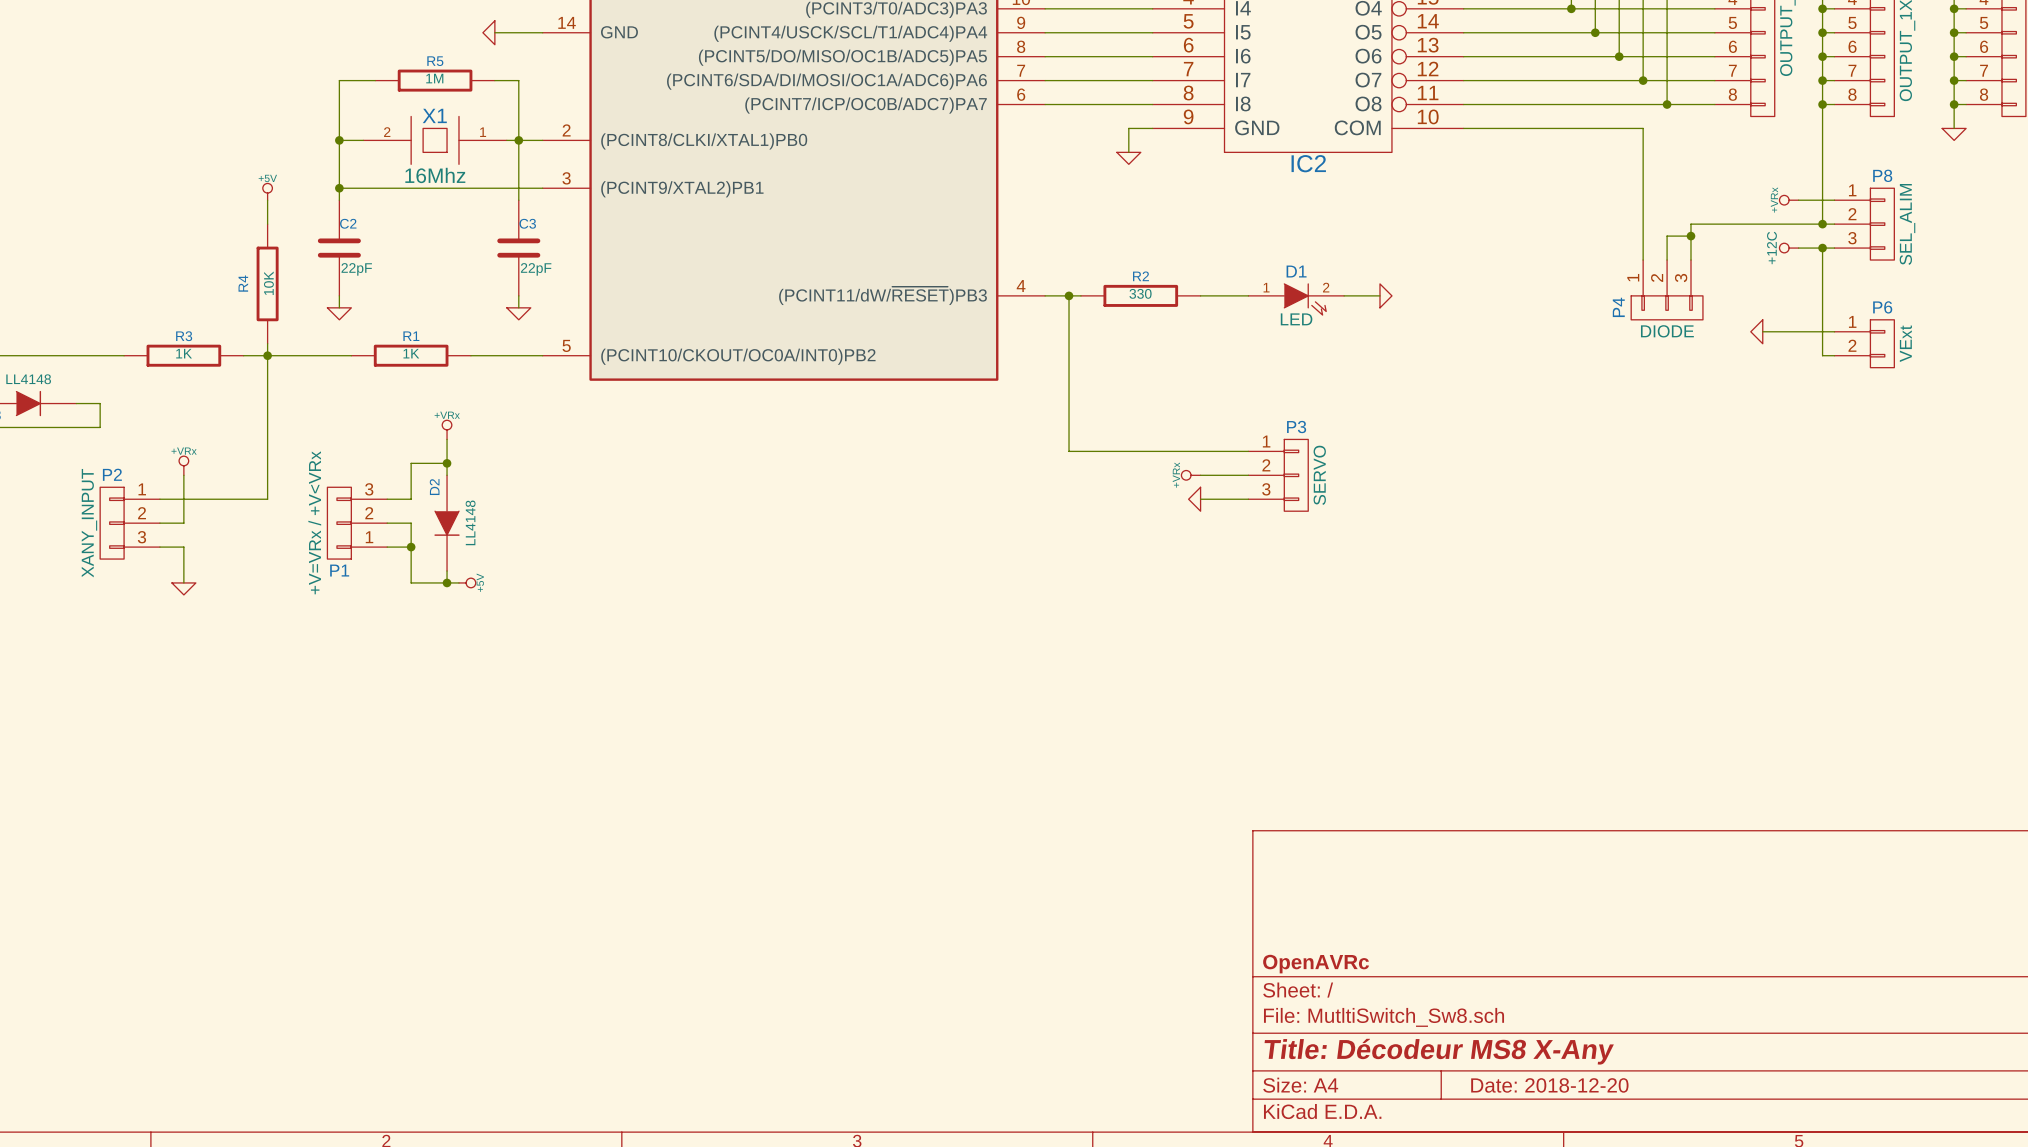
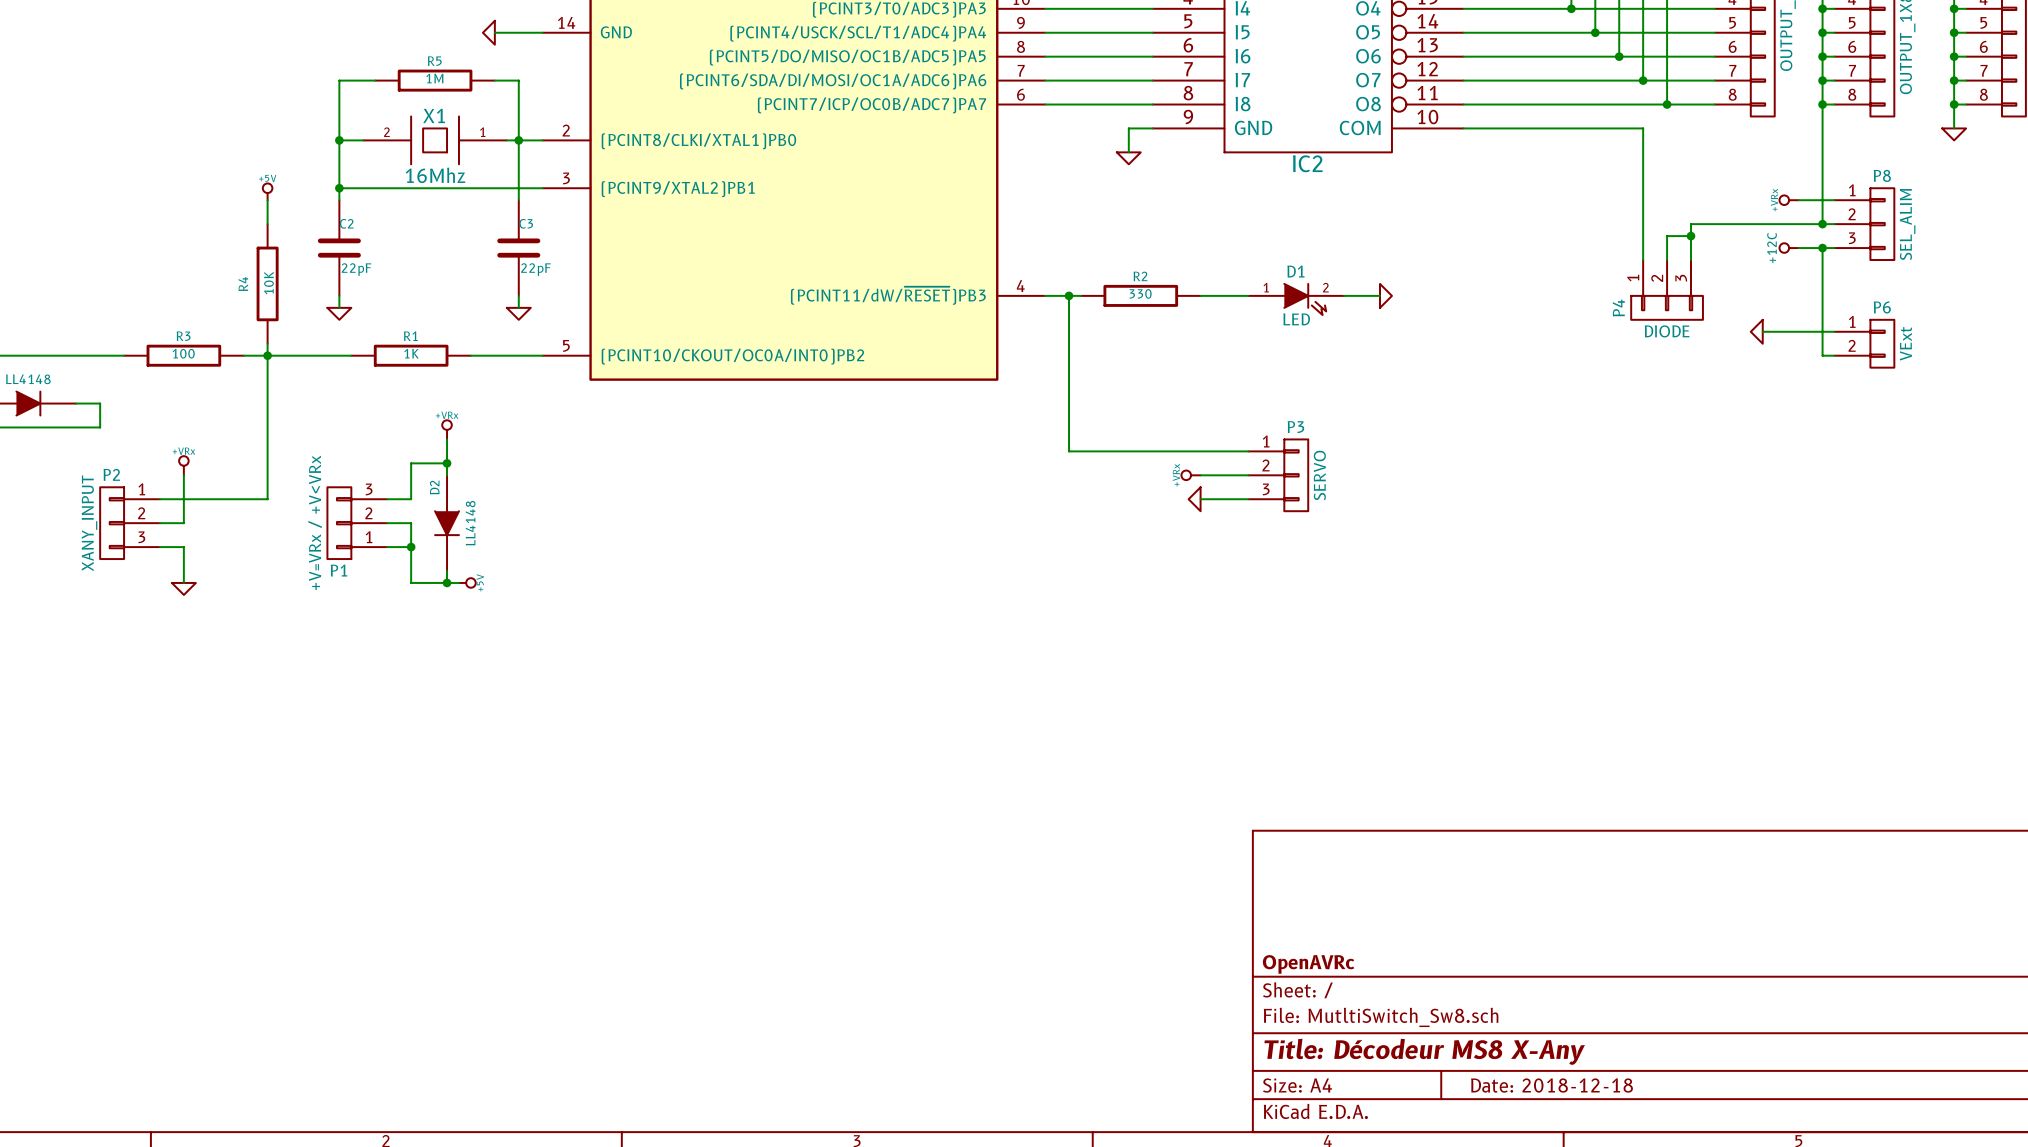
R3 value: 1K (184, 353) -> 100 (183, 353)
title block: Date: 2018-12-20 (1549, 1085) -> Date: 2018-12-18 (1551, 1085)

